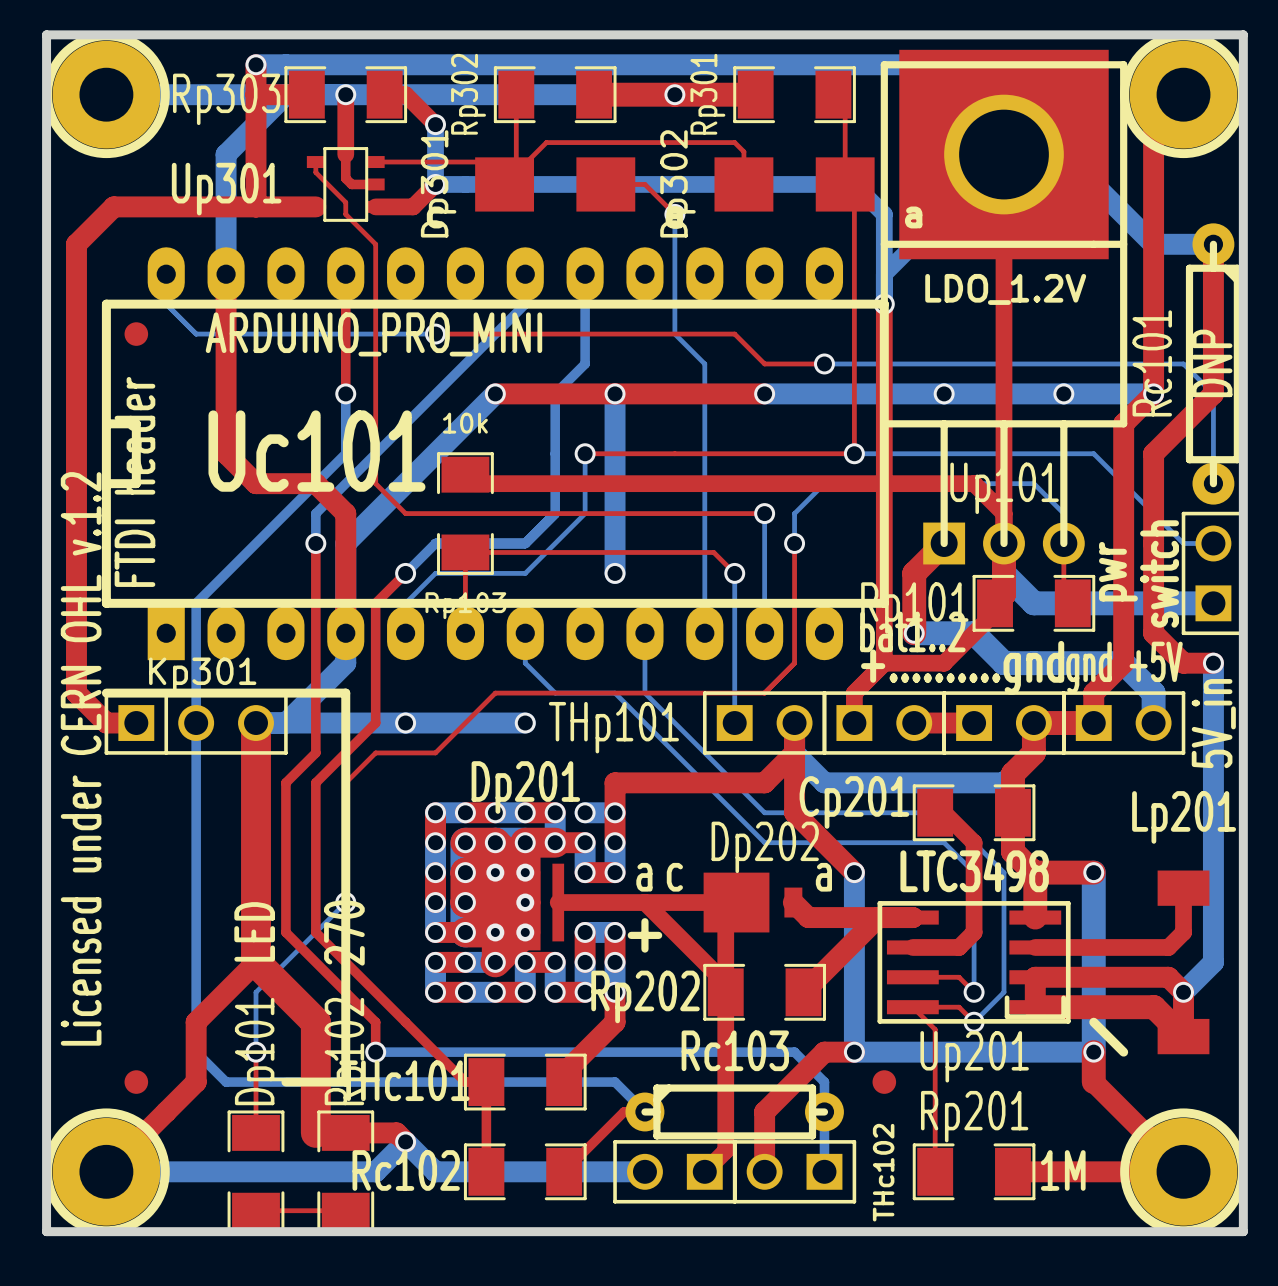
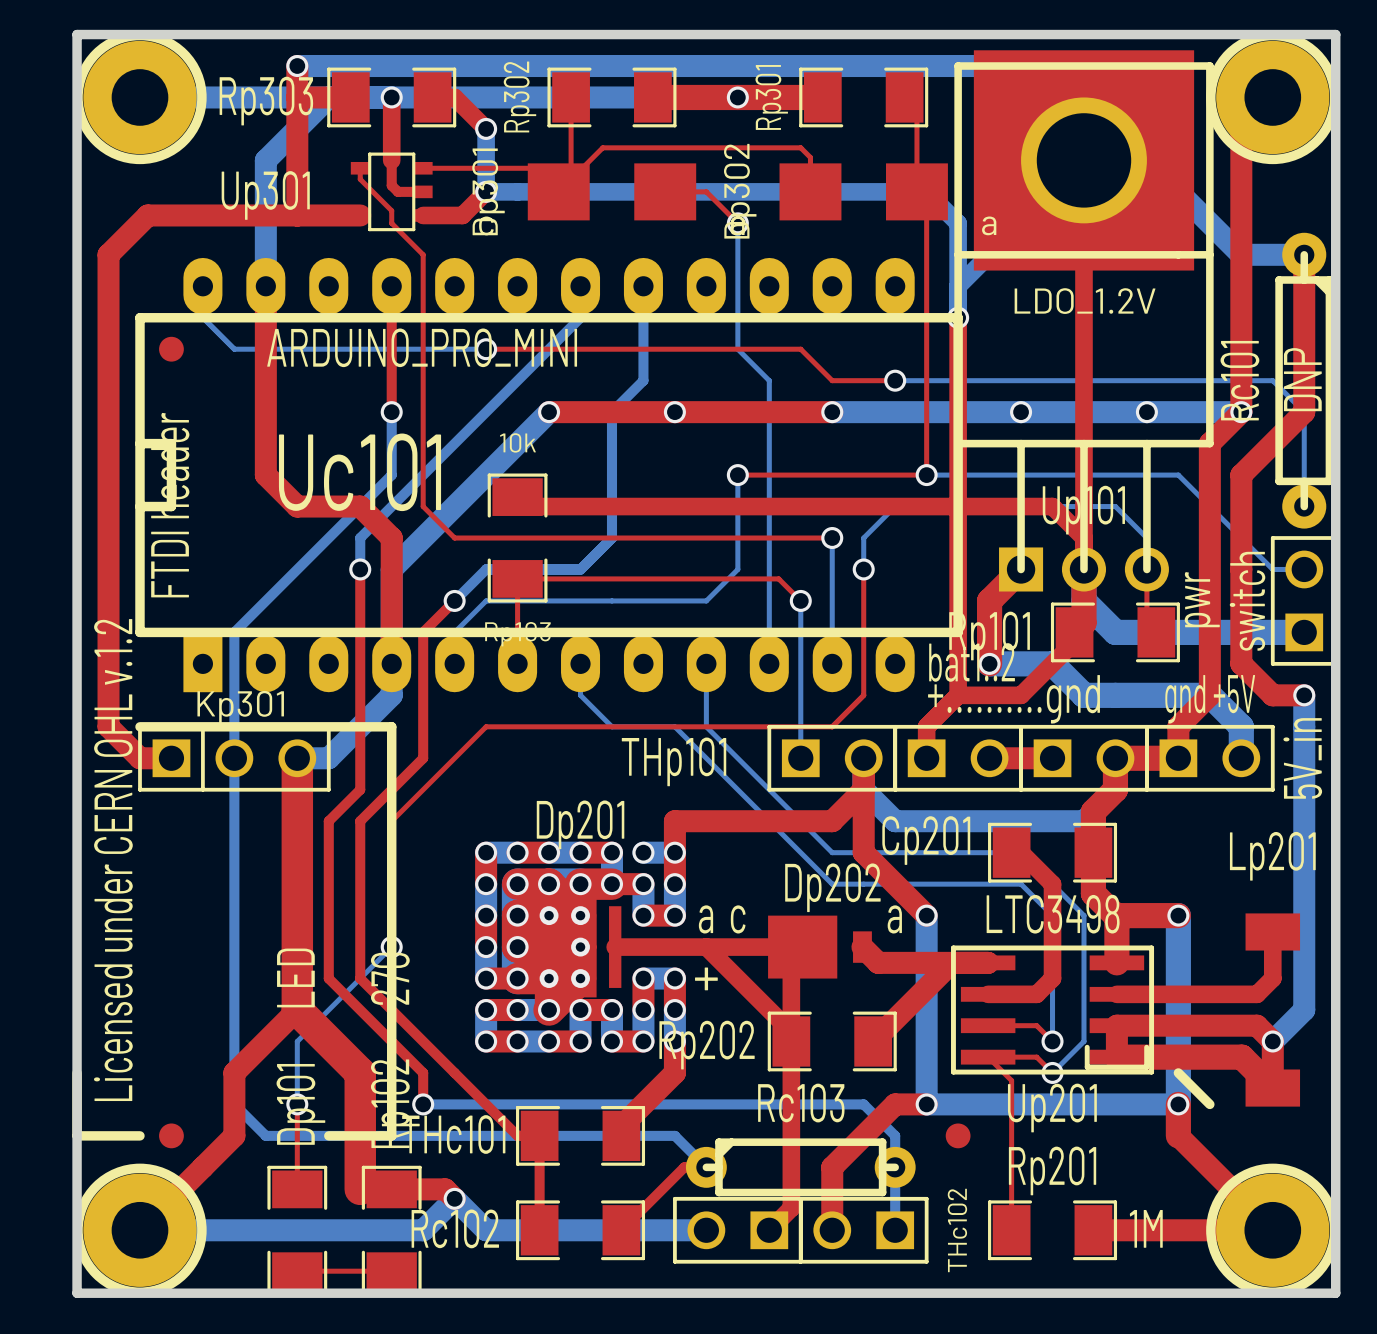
bottom track: (615, 393) (615, 573) -> none
top track: (585, 453) (674, 453) -> none
bottom track: (585, 453) (585, 513) (525, 573) -> (737, 475) (737, 569) (706, 600) (580, 600)
via: (585, 453) -> none
via: none -> (737, 475)
via: (615, 573) -> none
Kp301 footprint: [101, 688, 351, 1087] -> [72, 722, 397, 1141]
top track: (495, 693) (435, 752) (375, 752) -> (549, 726) (486, 726) (423, 789)
bottom track: (285, 723) (525, 723) -> none
via: (405, 723) -> none
via: (525, 723) -> none

